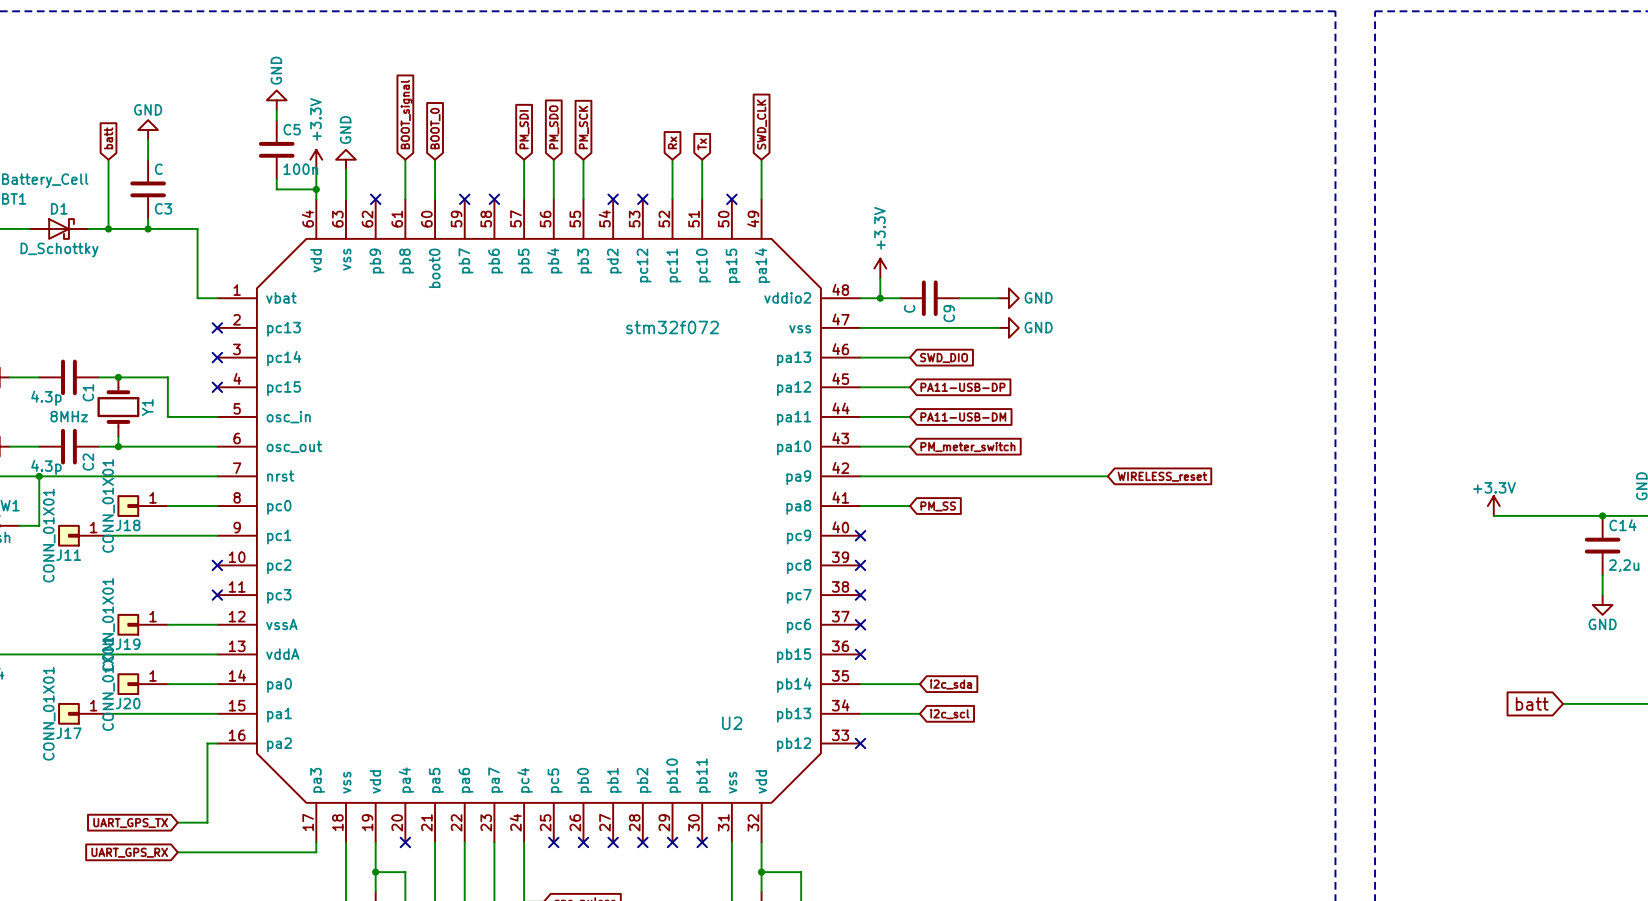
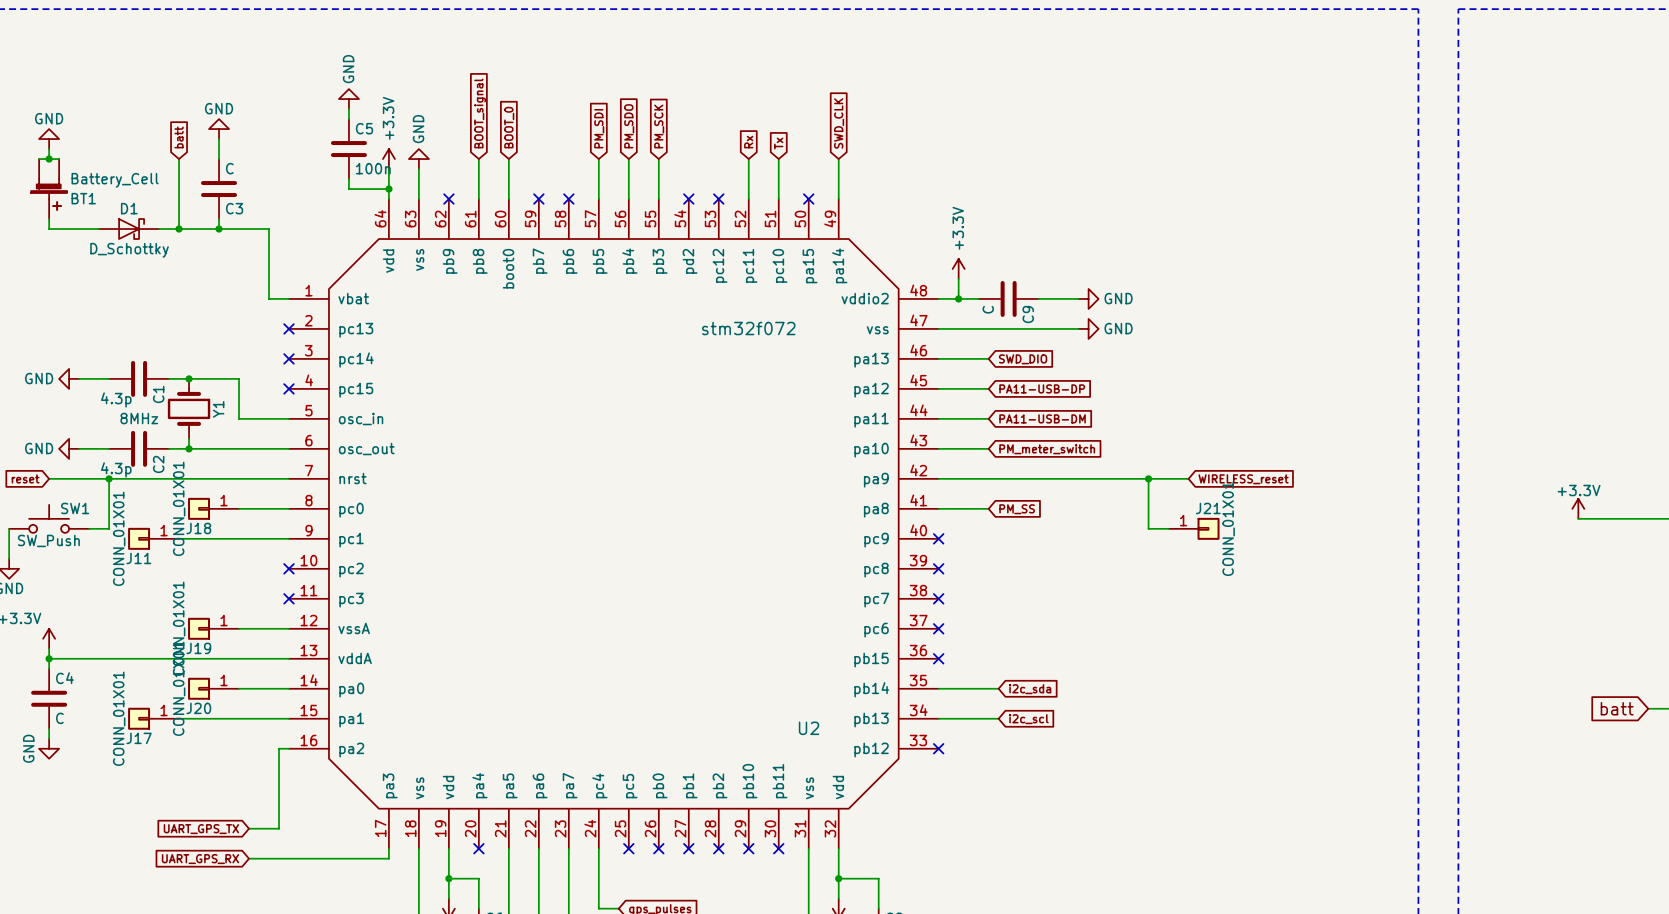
wire: none -> (1148, 478) (1148, 528) (1168, 528)
junction: none -> (1148, 478)
J21: none -> CONN_01X01 (1194, 528)

